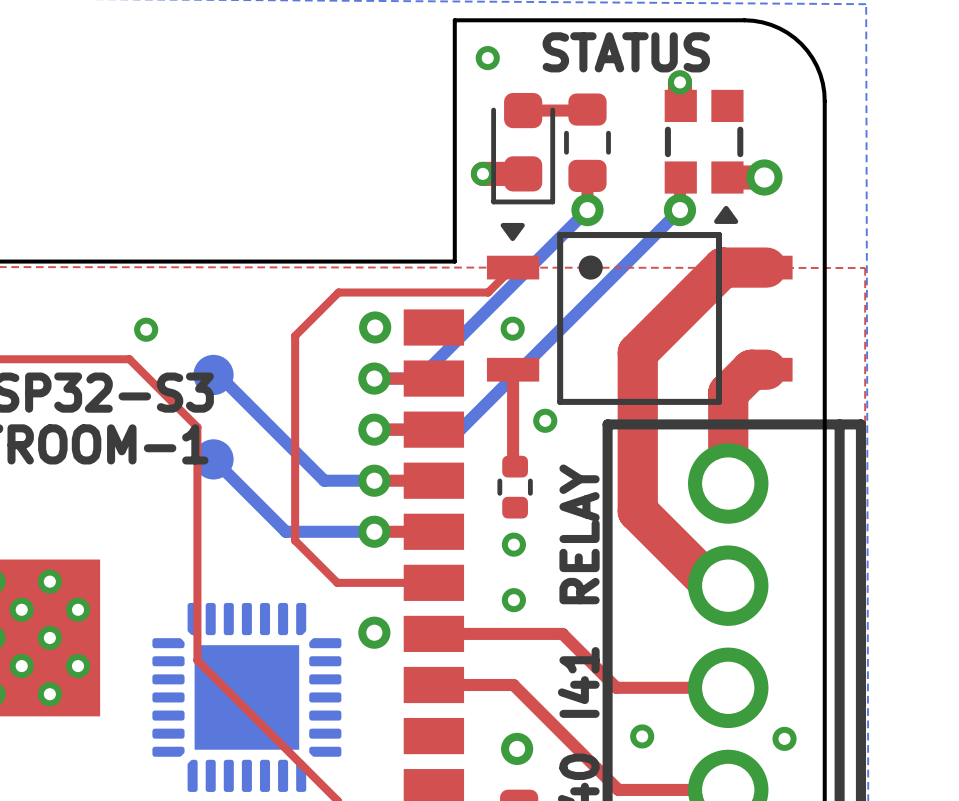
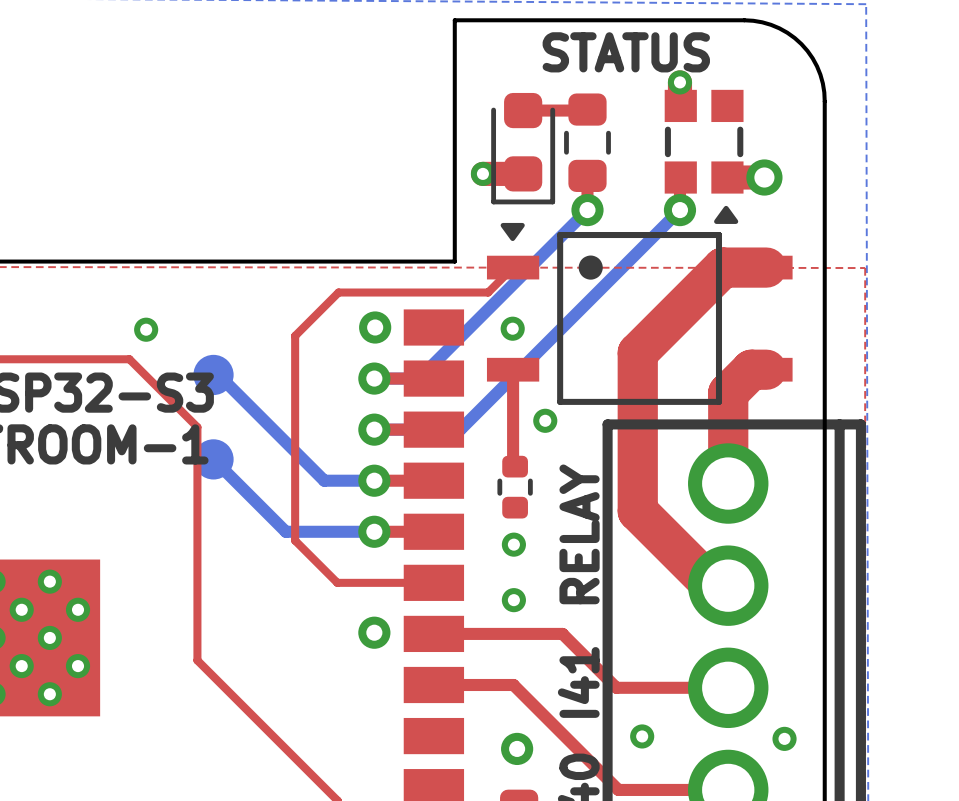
via: (487, 58) -> none
part: (246, 697) -> none

